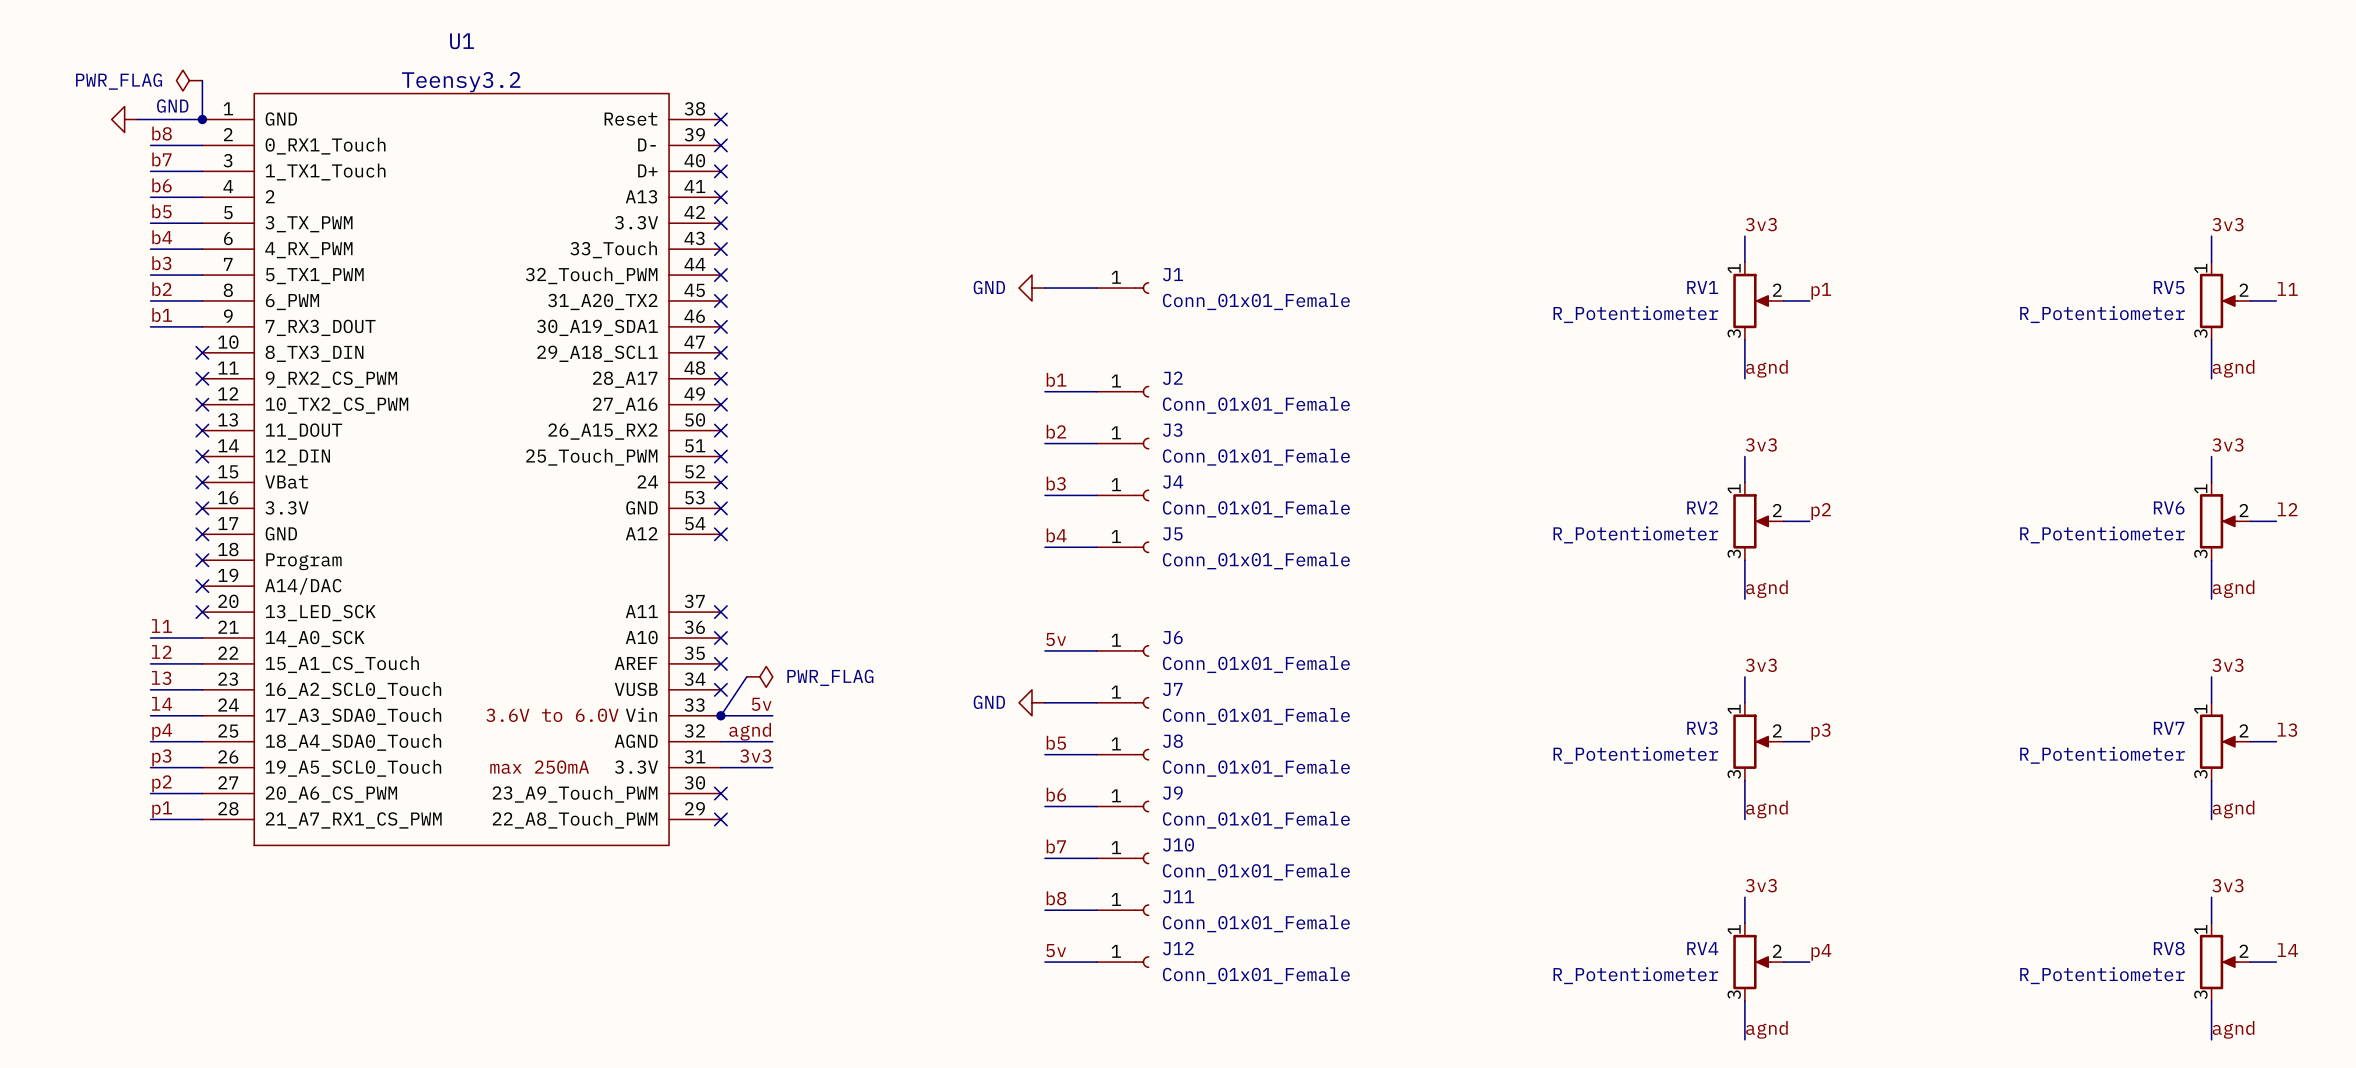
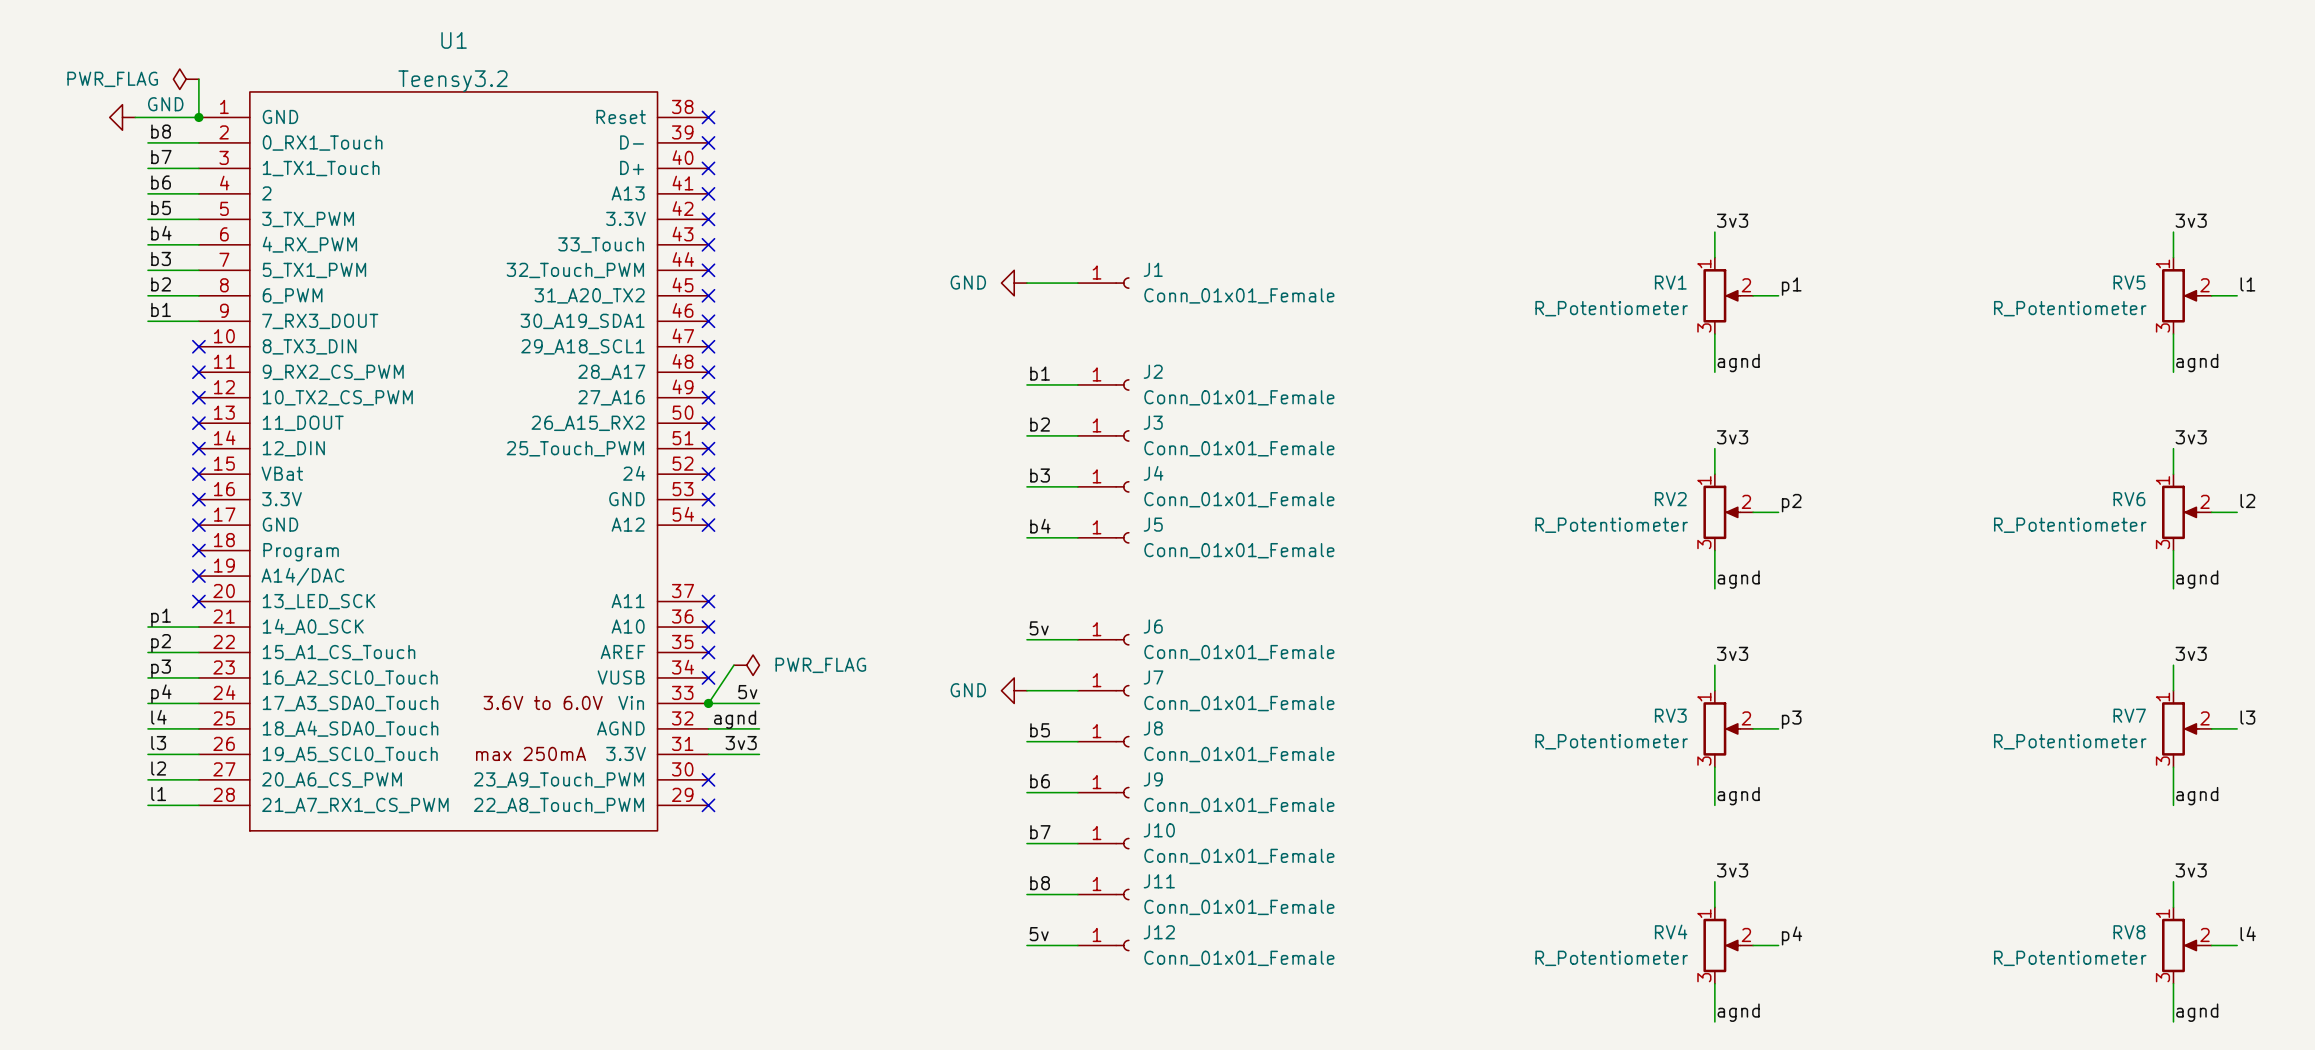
label: l1 (162, 626) -> p1 (161, 617)
label: l2 (161, 651) -> p2 (161, 643)
label: l3 (161, 678) -> p3 (161, 668)
label: l4 (162, 703) -> p4 (161, 693)
label: p4 (162, 731) -> l4 (158, 717)
label: p3 (161, 757) -> l3 (158, 743)
label: p2 (161, 783) -> l2 (158, 768)
label: p1 (162, 809) -> l1 (158, 793)

